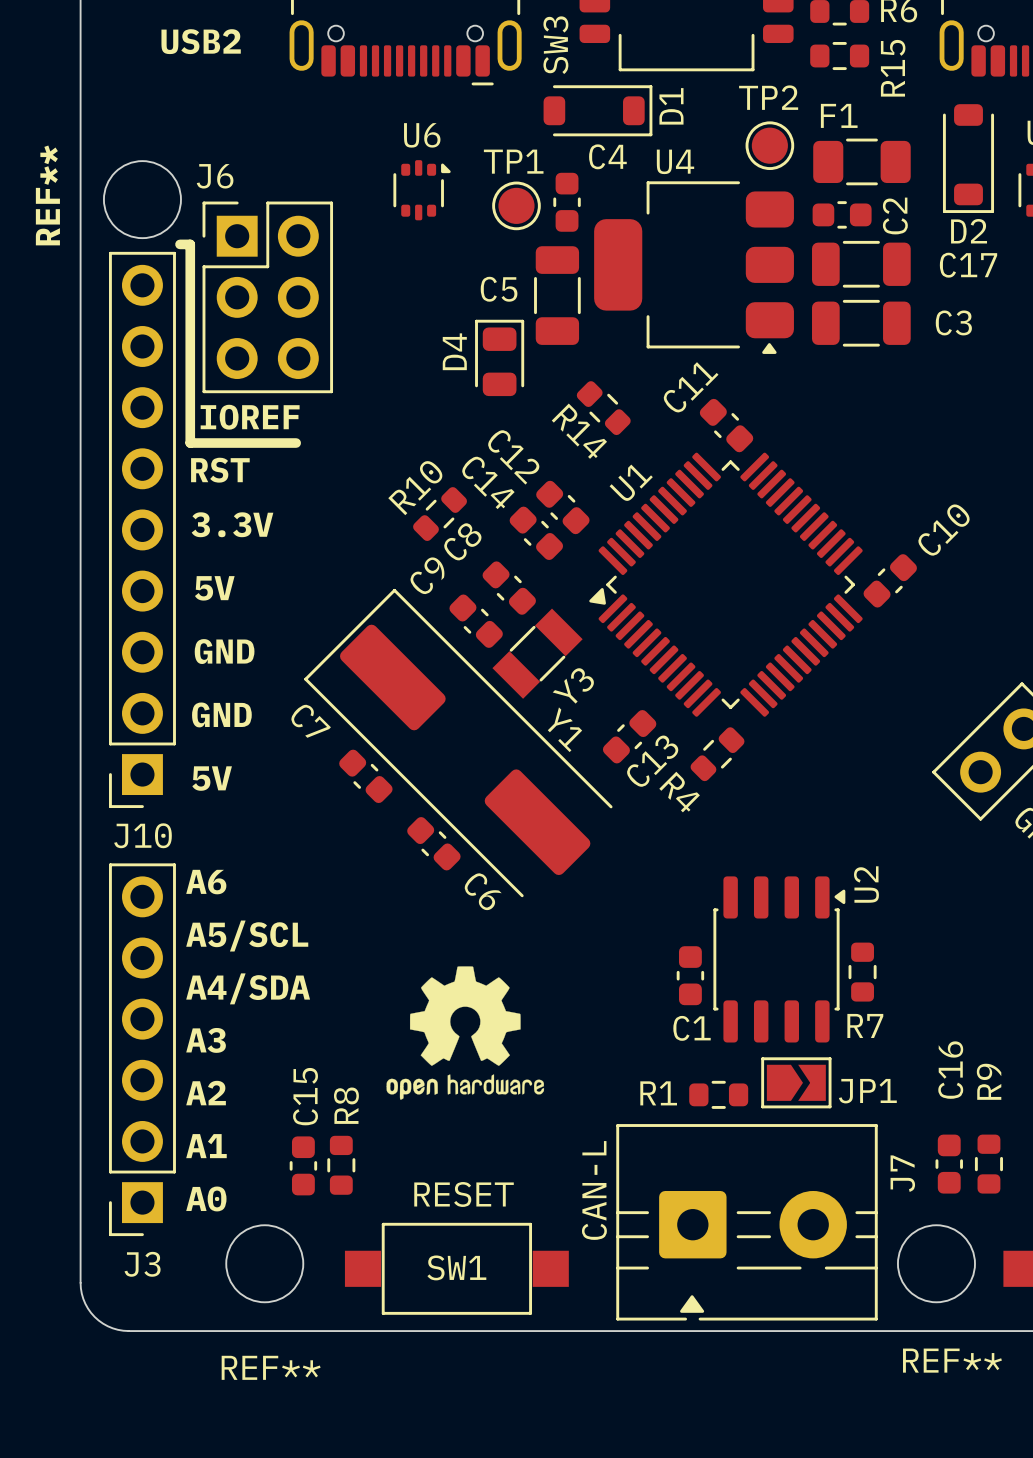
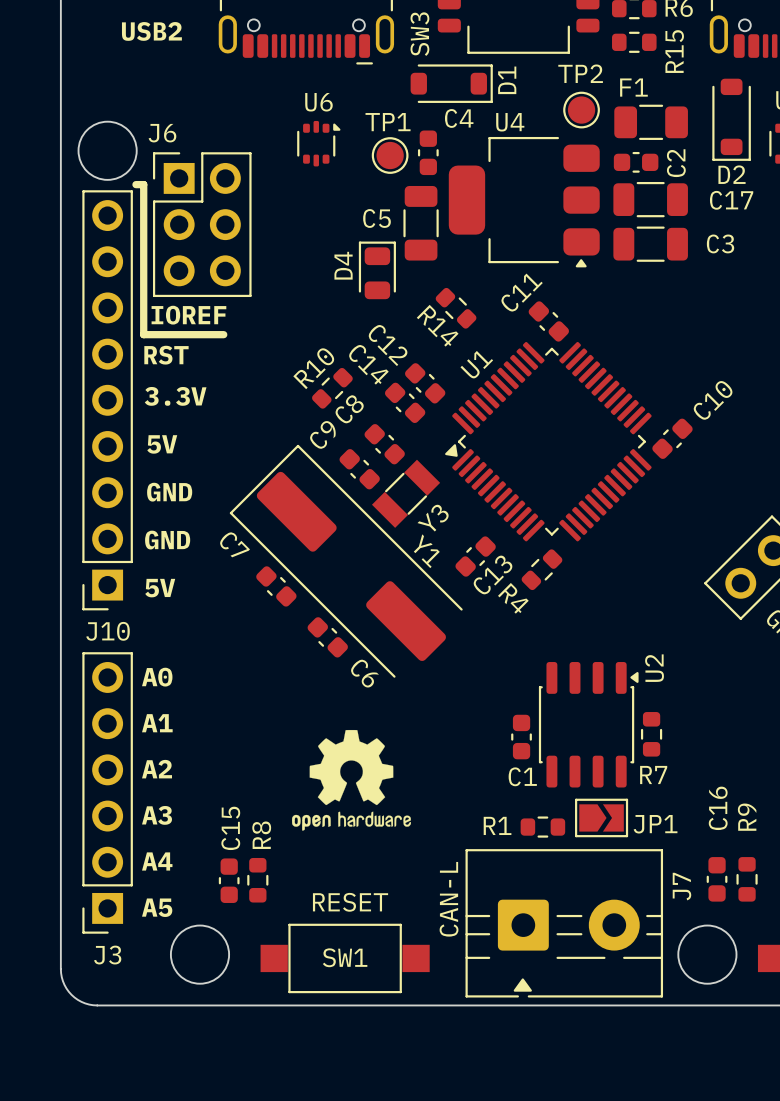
REF** name: REF** (47, 195) -> none
text: A6 (206, 882) -> A0 (157, 677)
text: A5/SCL (247, 936) -> none
text: none -> A1 (157, 723)
text: A4/SDA (248, 988) -> none
text: none -> A2 (157, 769)
text: A3 (206, 1040) -> none
text: A2 (206, 1093) -> A3 (157, 815)
text: A1 (206, 1146) -> A4 (157, 861)
text: A0 (206, 1198) -> A5 (157, 907)
REF** name: REF** (952, 1360) -> none
REF** name: REF** (271, 1367) -> none

